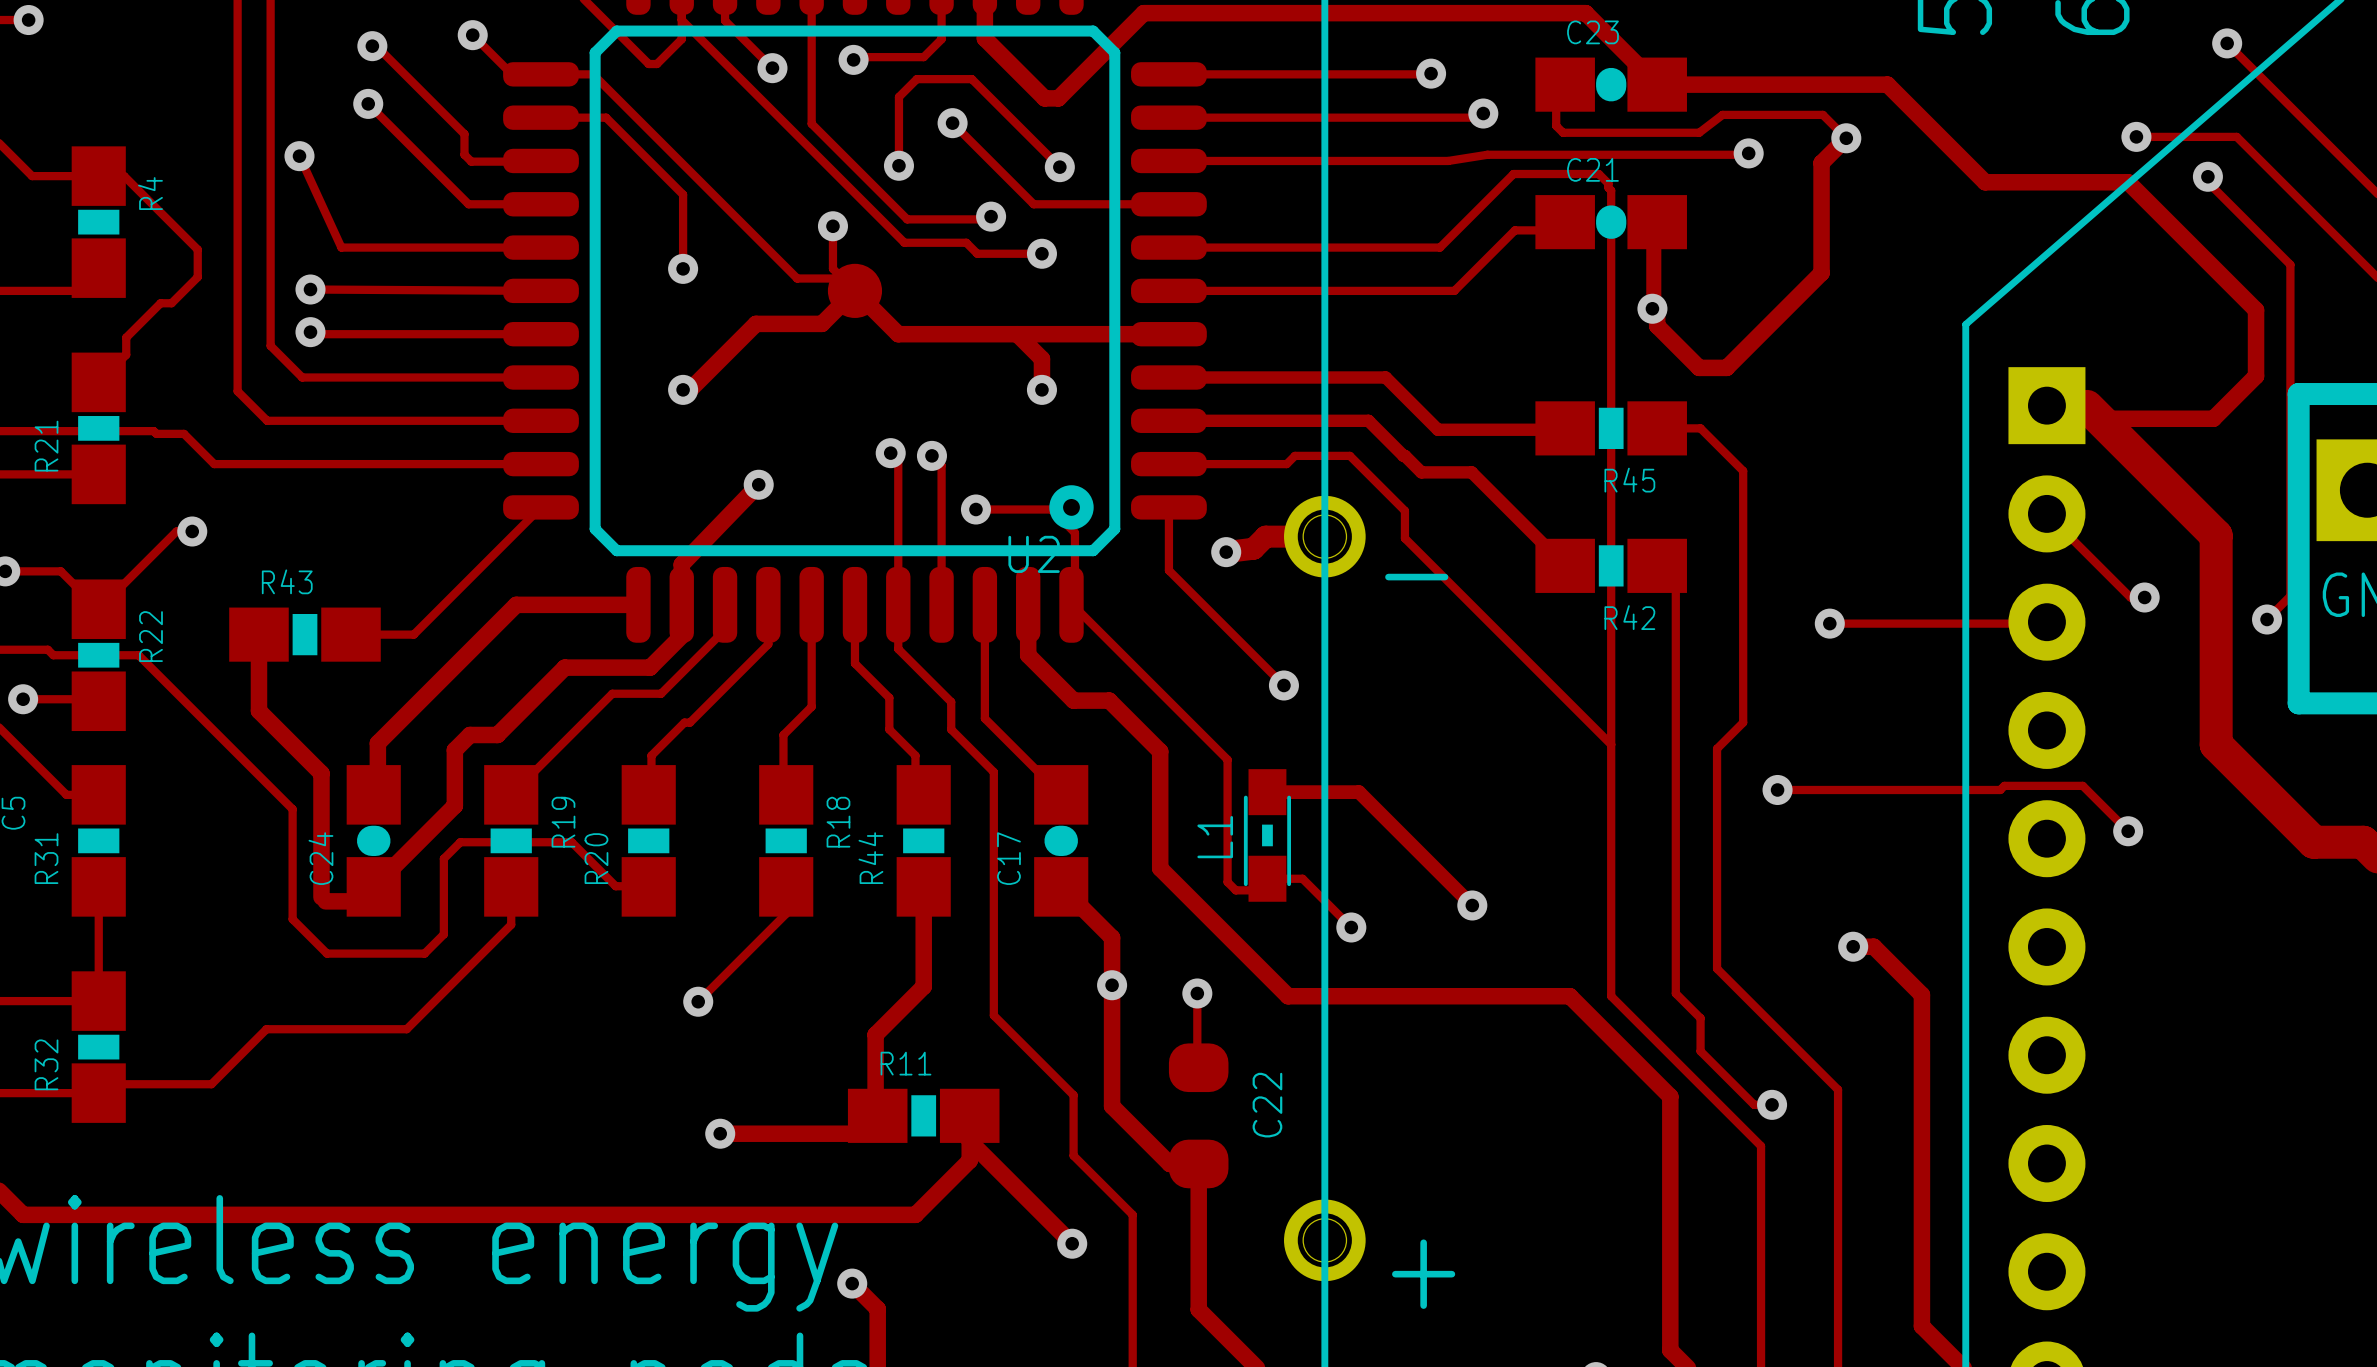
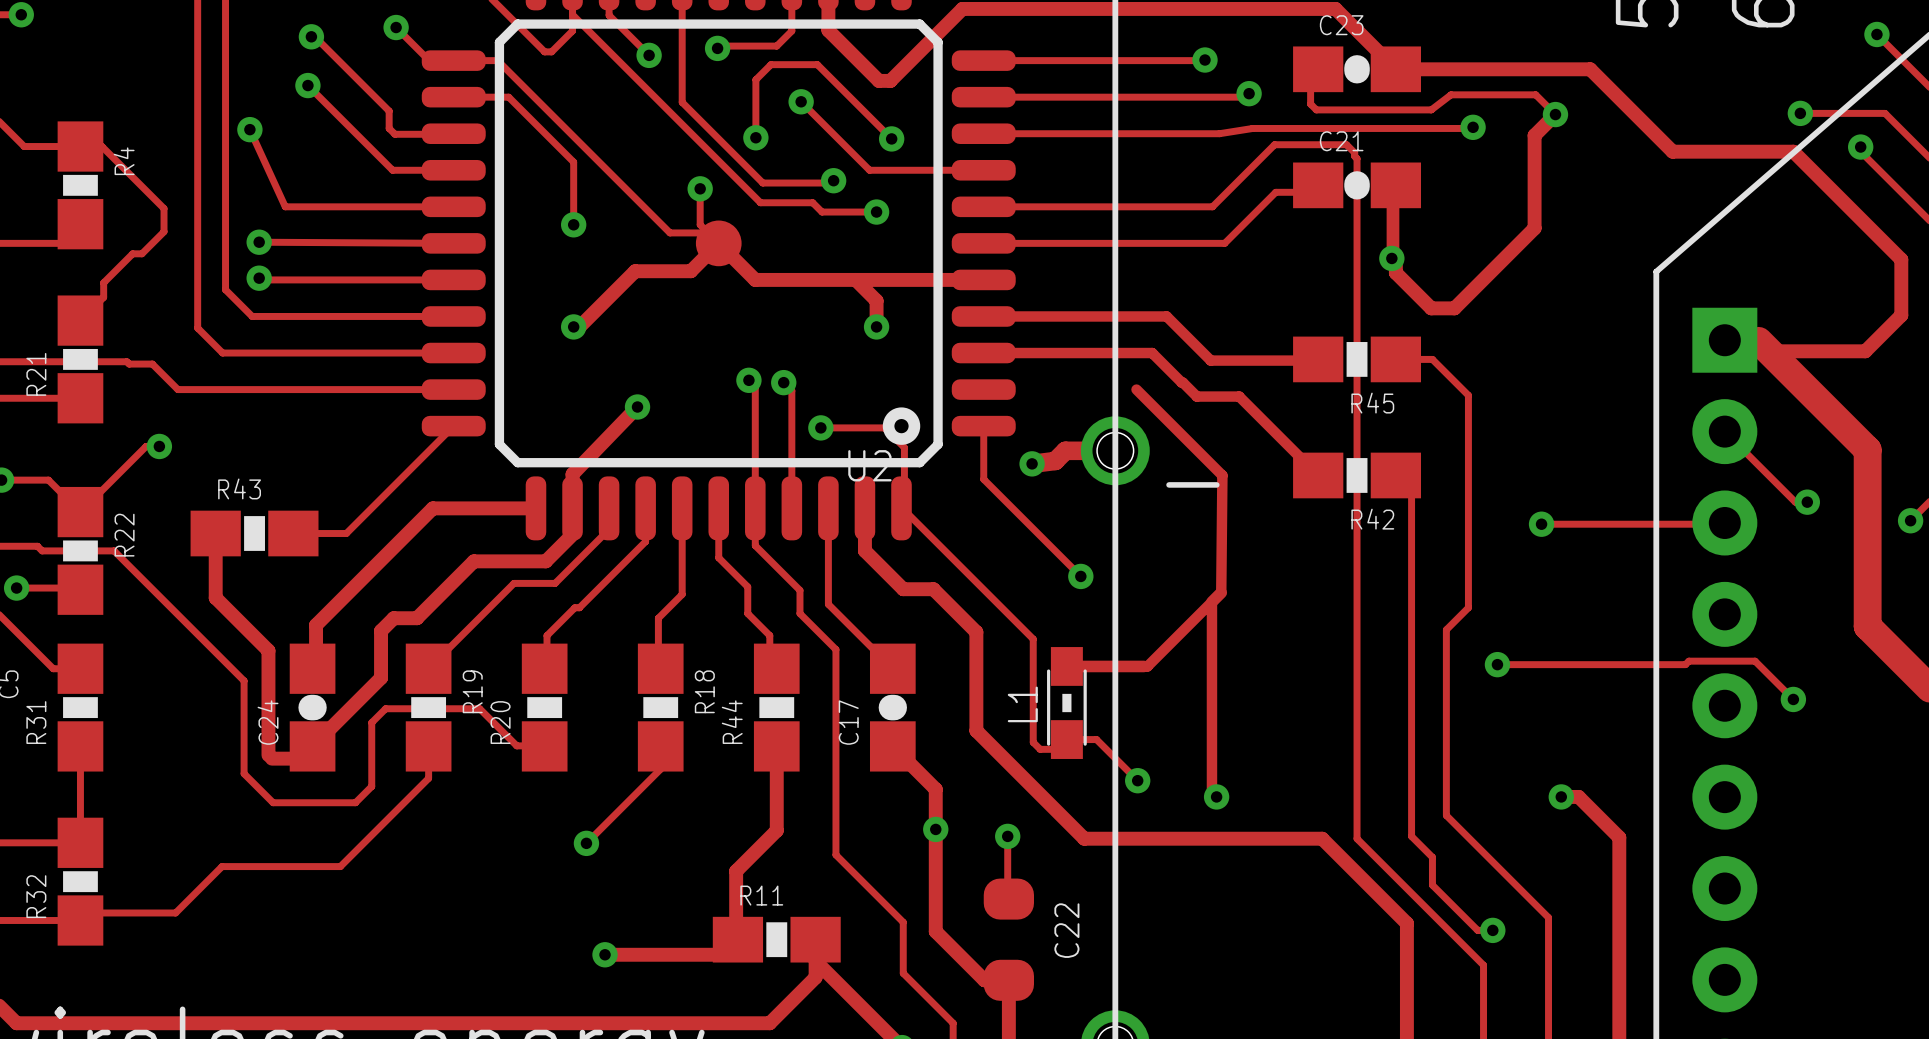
track: (1168, 464) (1286, 464) (1294, 455) (1349, 455) (1404, 510) (1404, 538) (1611, 744) -> none
track: none -> (1136, 389) (1222, 475) (1221, 592) (1211, 601)
track: none -> (1211, 601) (1211, 792) (1216, 796)
track: (1358, 792) (1472, 905) -> (1144, 666) (1147, 666) (1211, 601)
via position: (1472, 905) -> (1216, 796)

